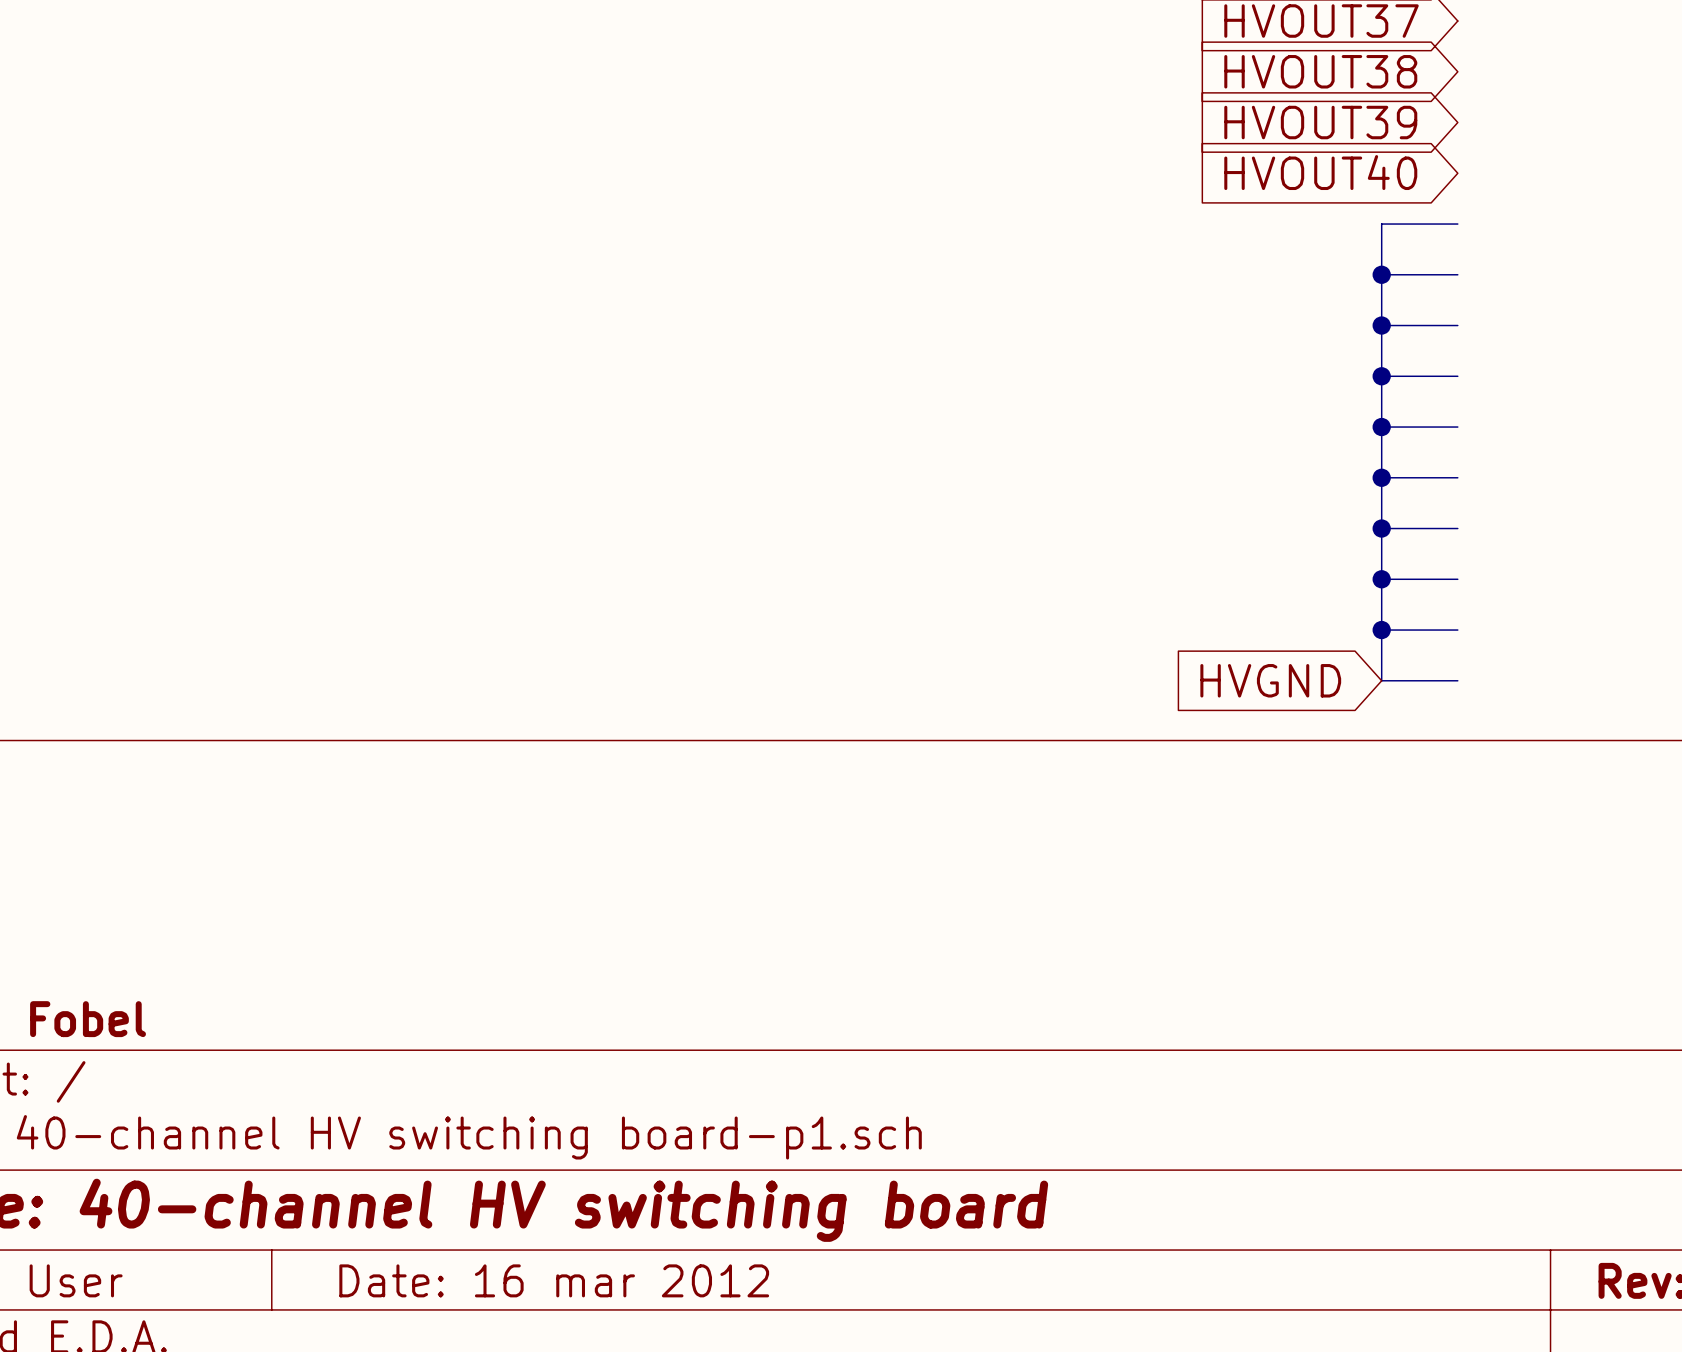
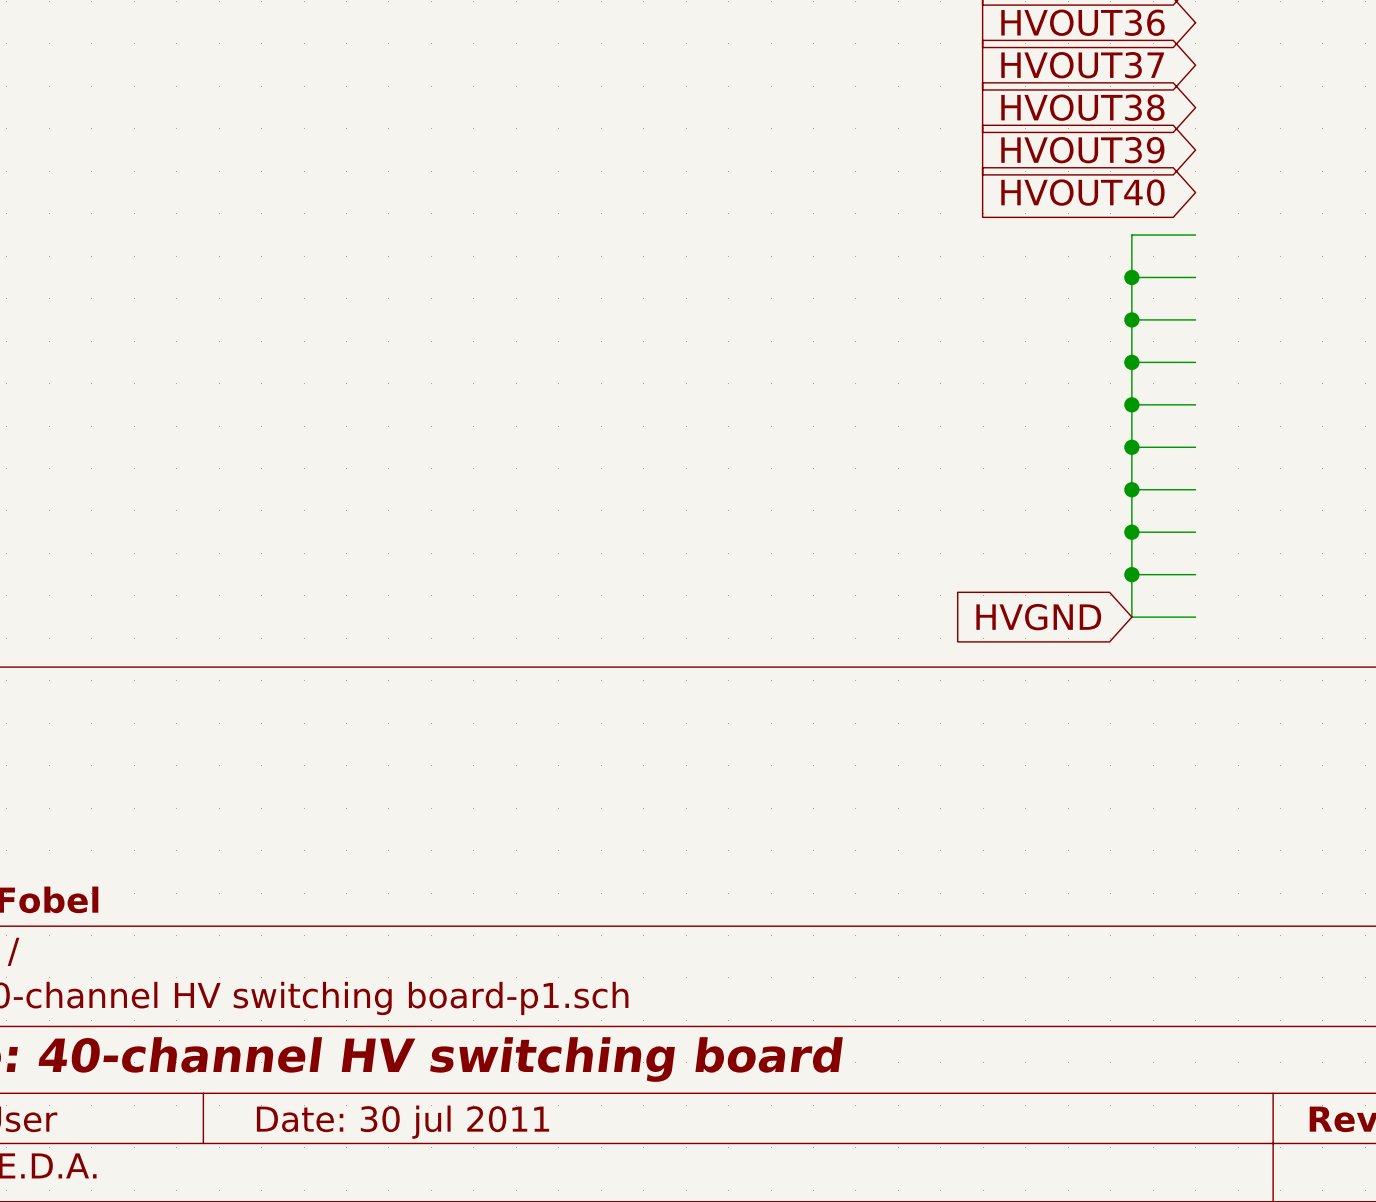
title block: Date: 16 mar 2012 (554, 1280) -> Date: 30 jul 2011 (403, 1122)

